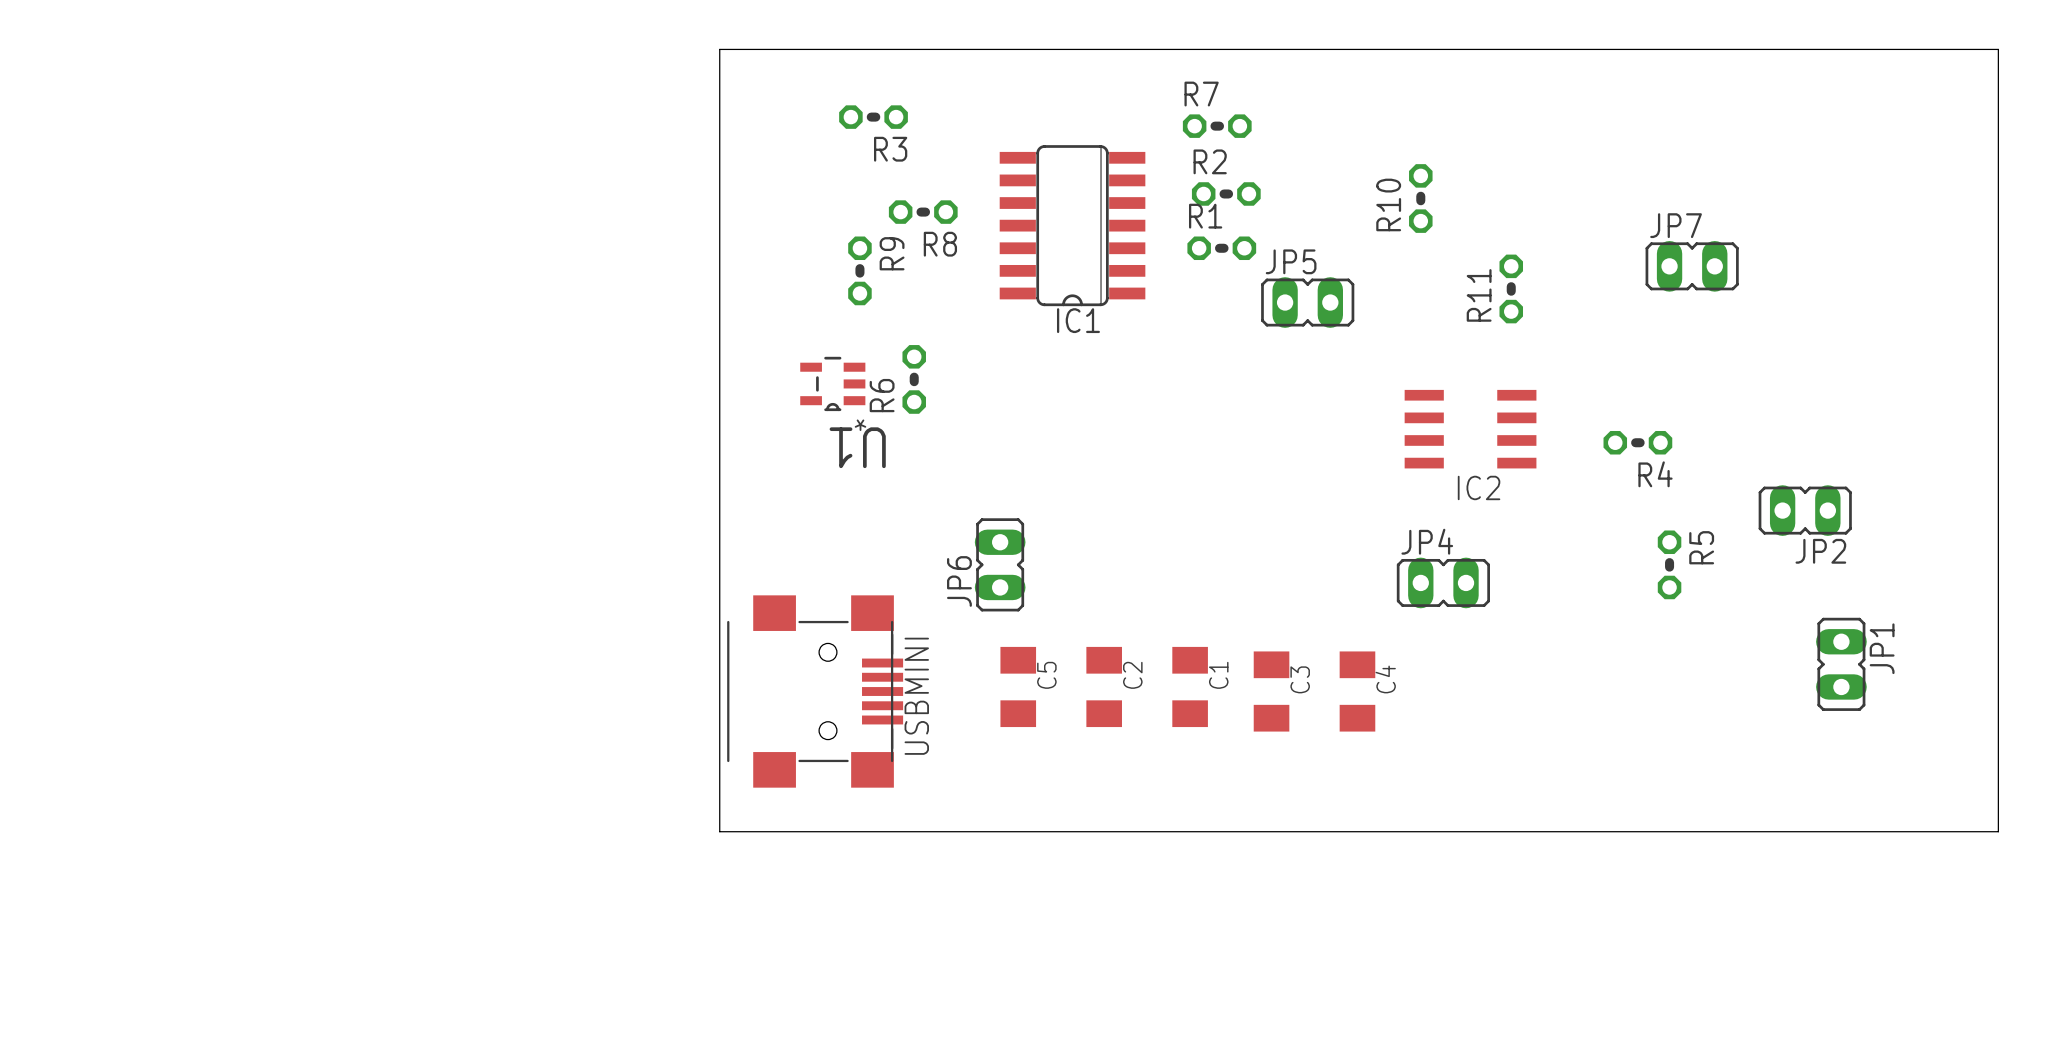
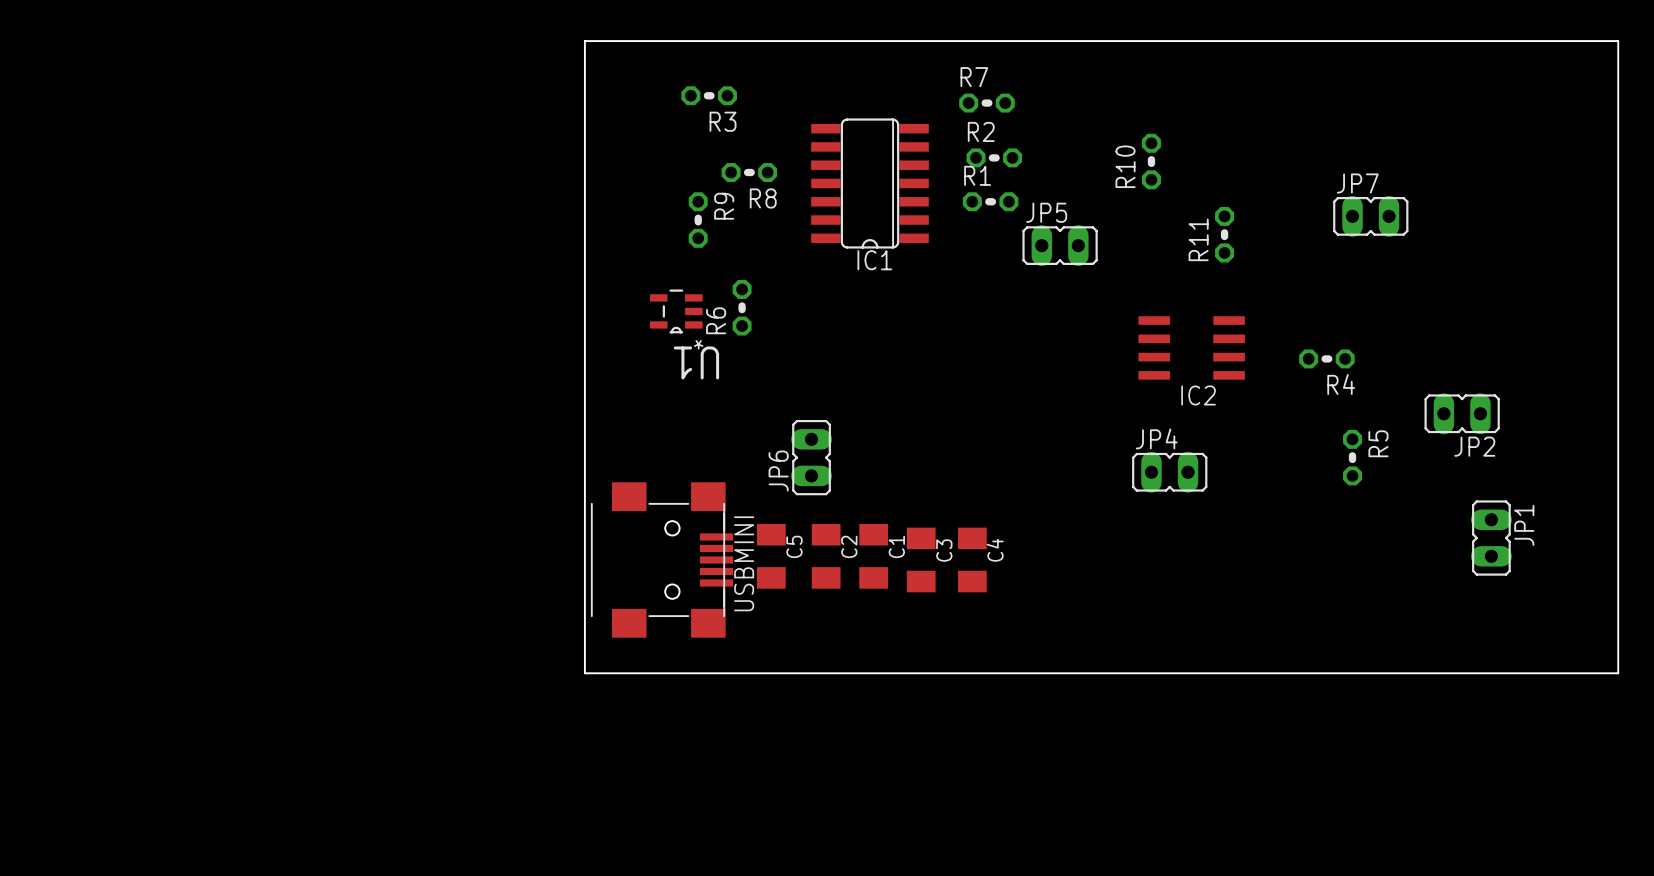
C5 name: C5 (1046, 675) -> C2 (849, 546)
C5: none -> (771, 556)
C2: (1104, 686) -> none
C1 position: (1190, 686) -> (873, 556)
C3 position: (1271, 691) -> (921, 559)
C4 position: (1357, 691) -> (972, 559)

